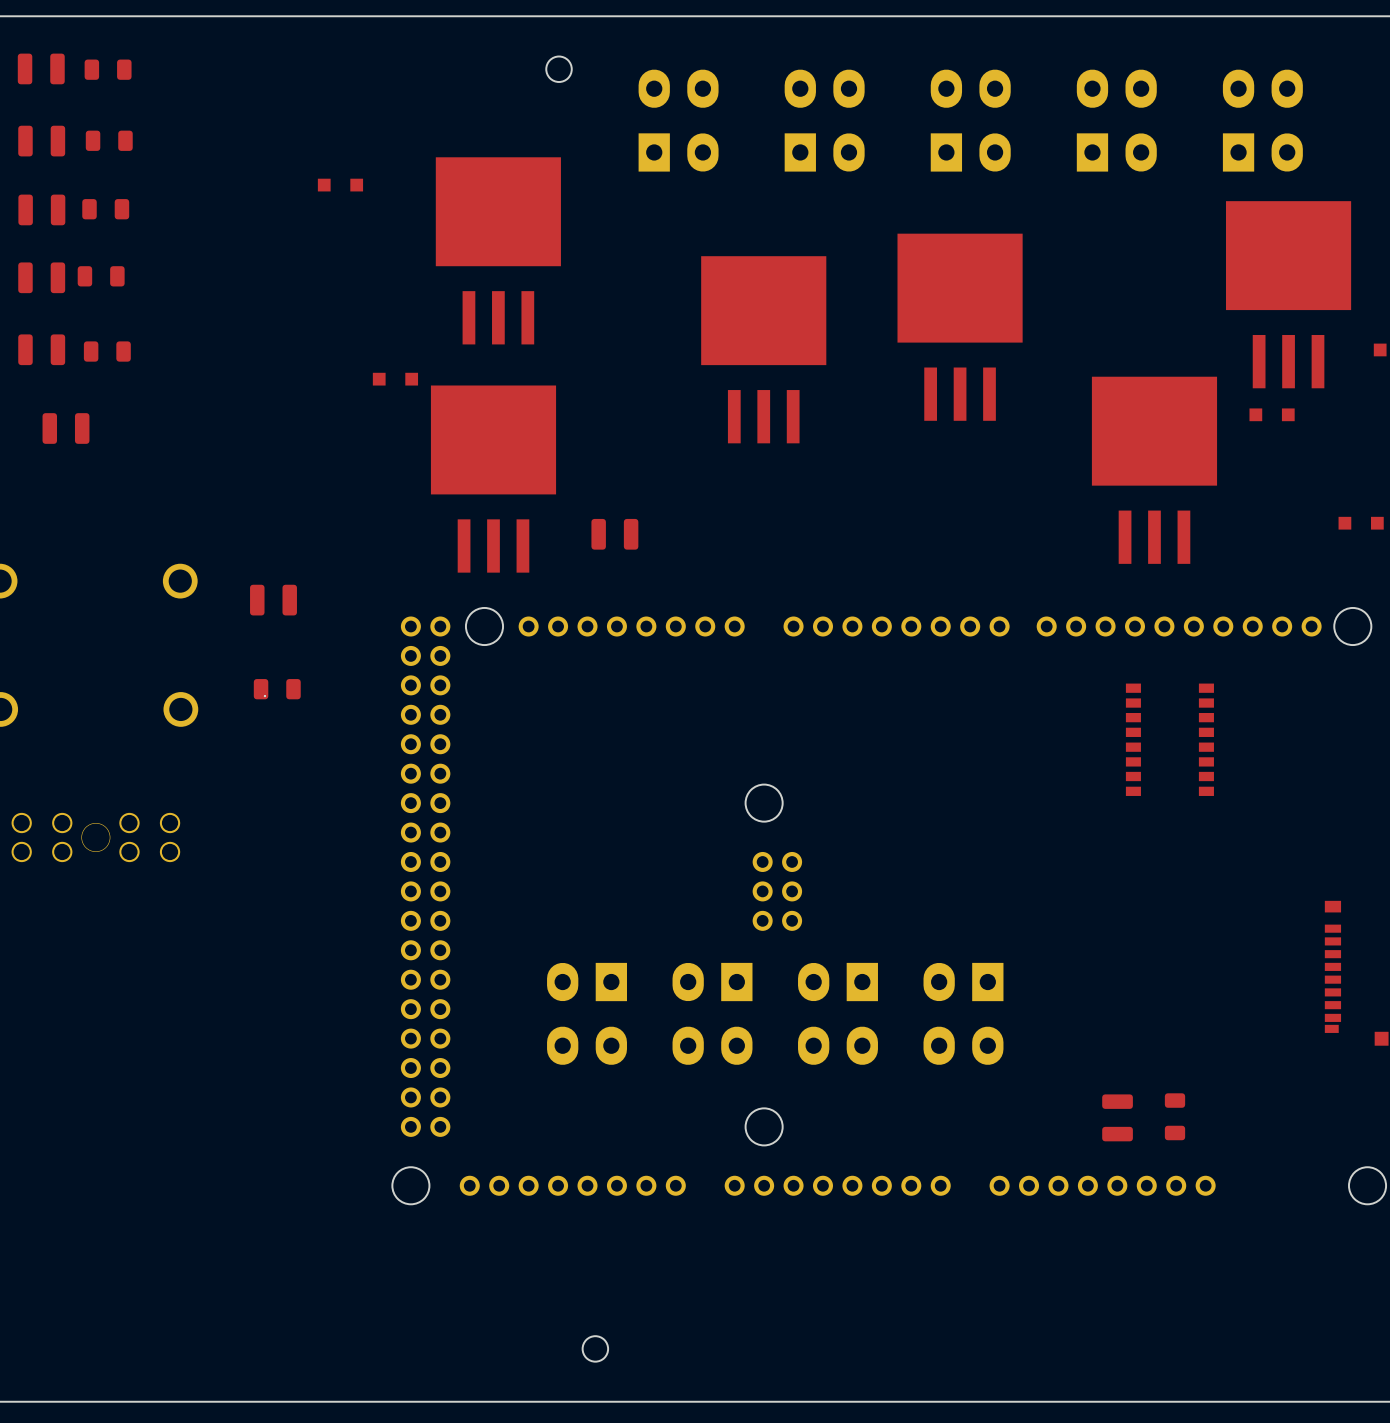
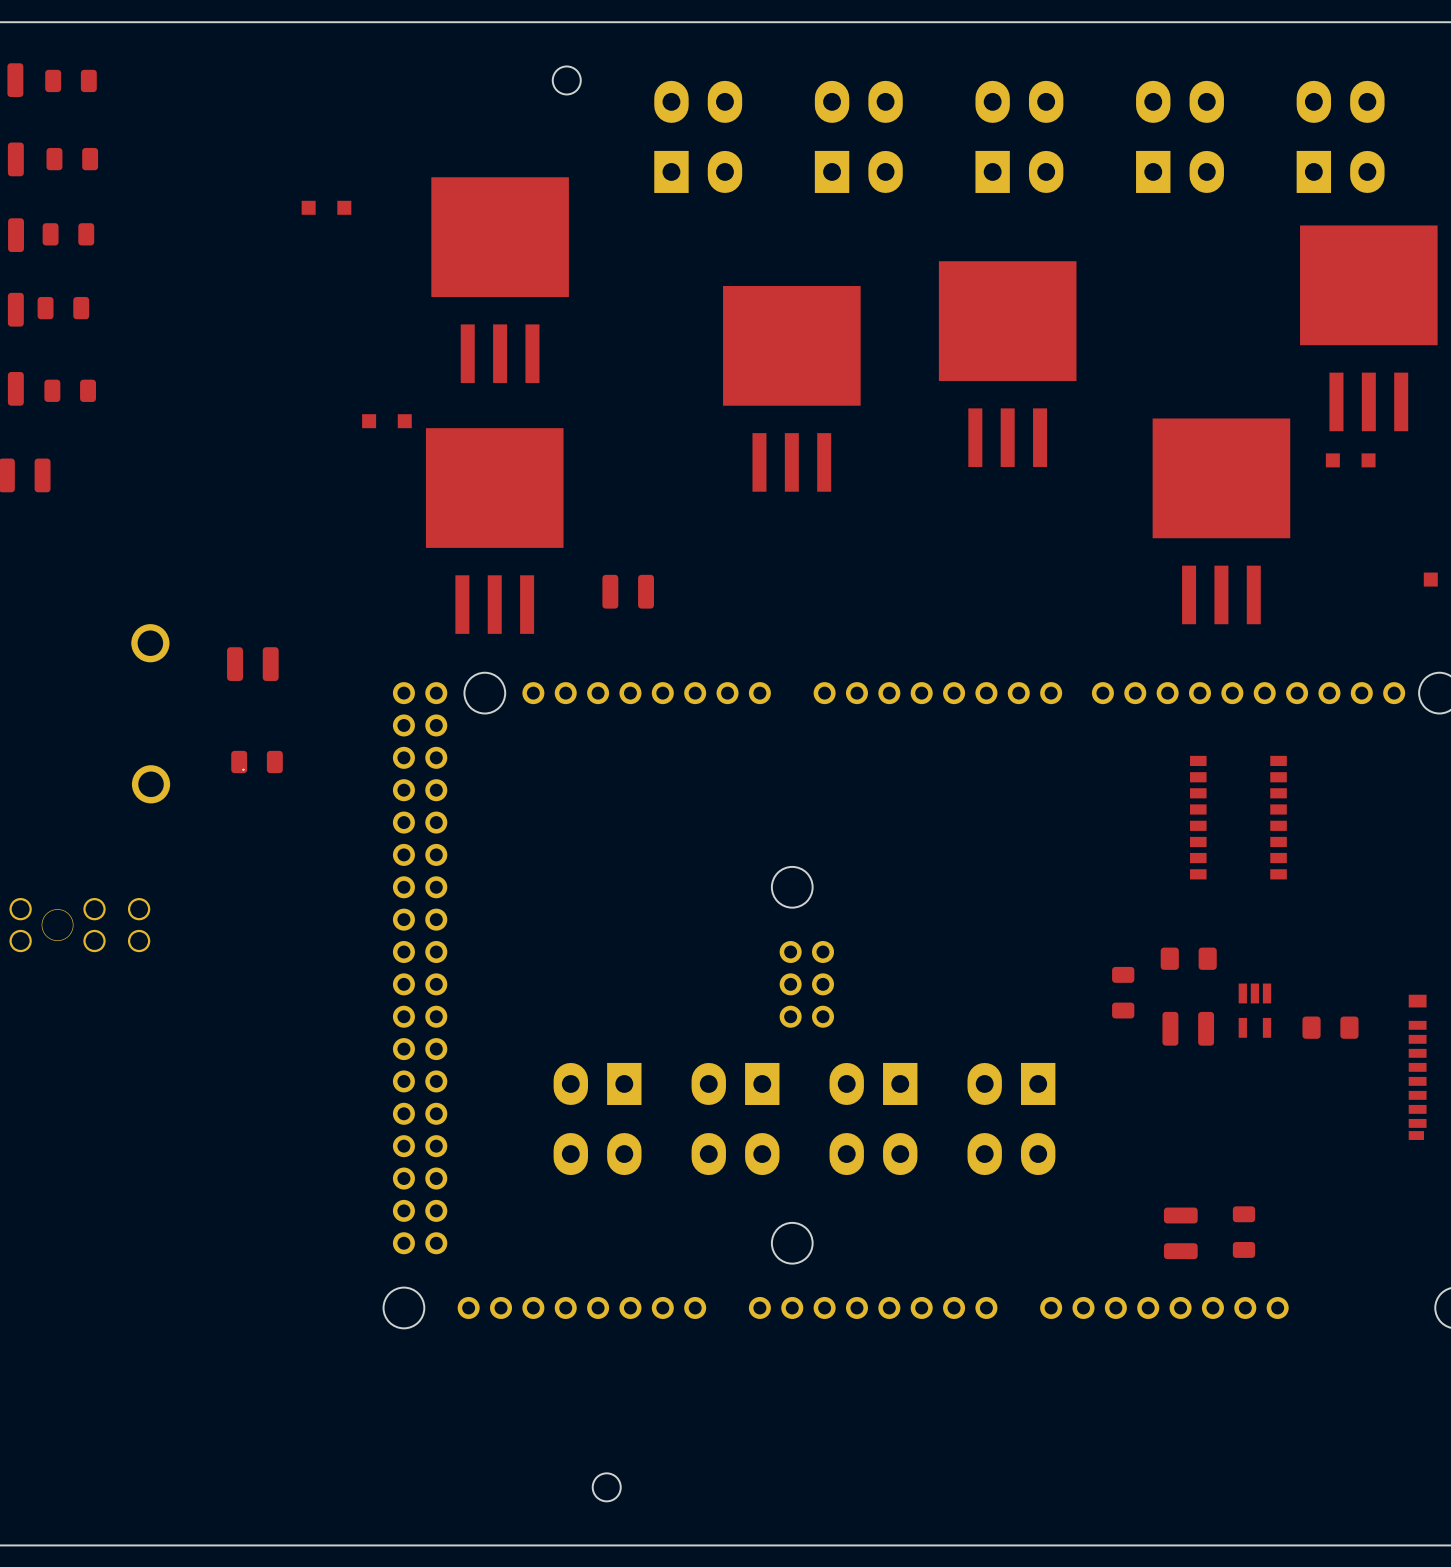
part: none -> (1188, 958)
part: none -> (1123, 992)
part: none -> (1254, 1010)
part: none -> (1330, 1027)
part: none -> (1188, 1028)

